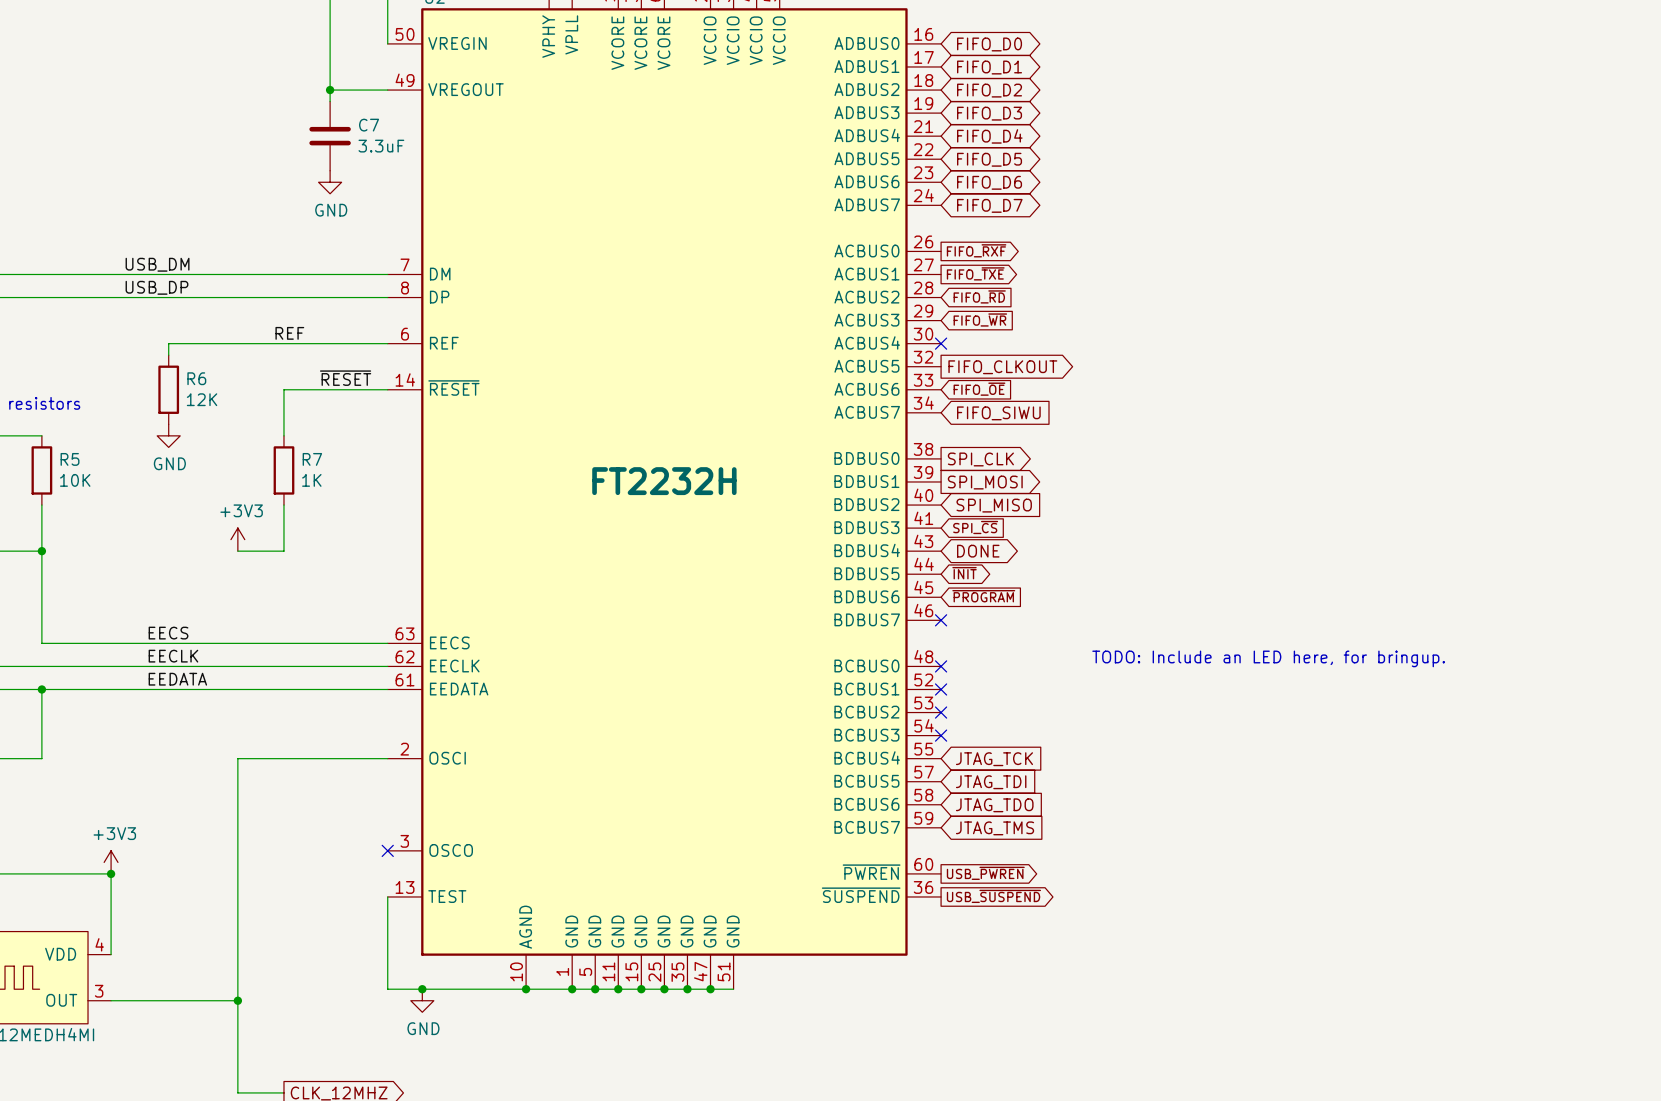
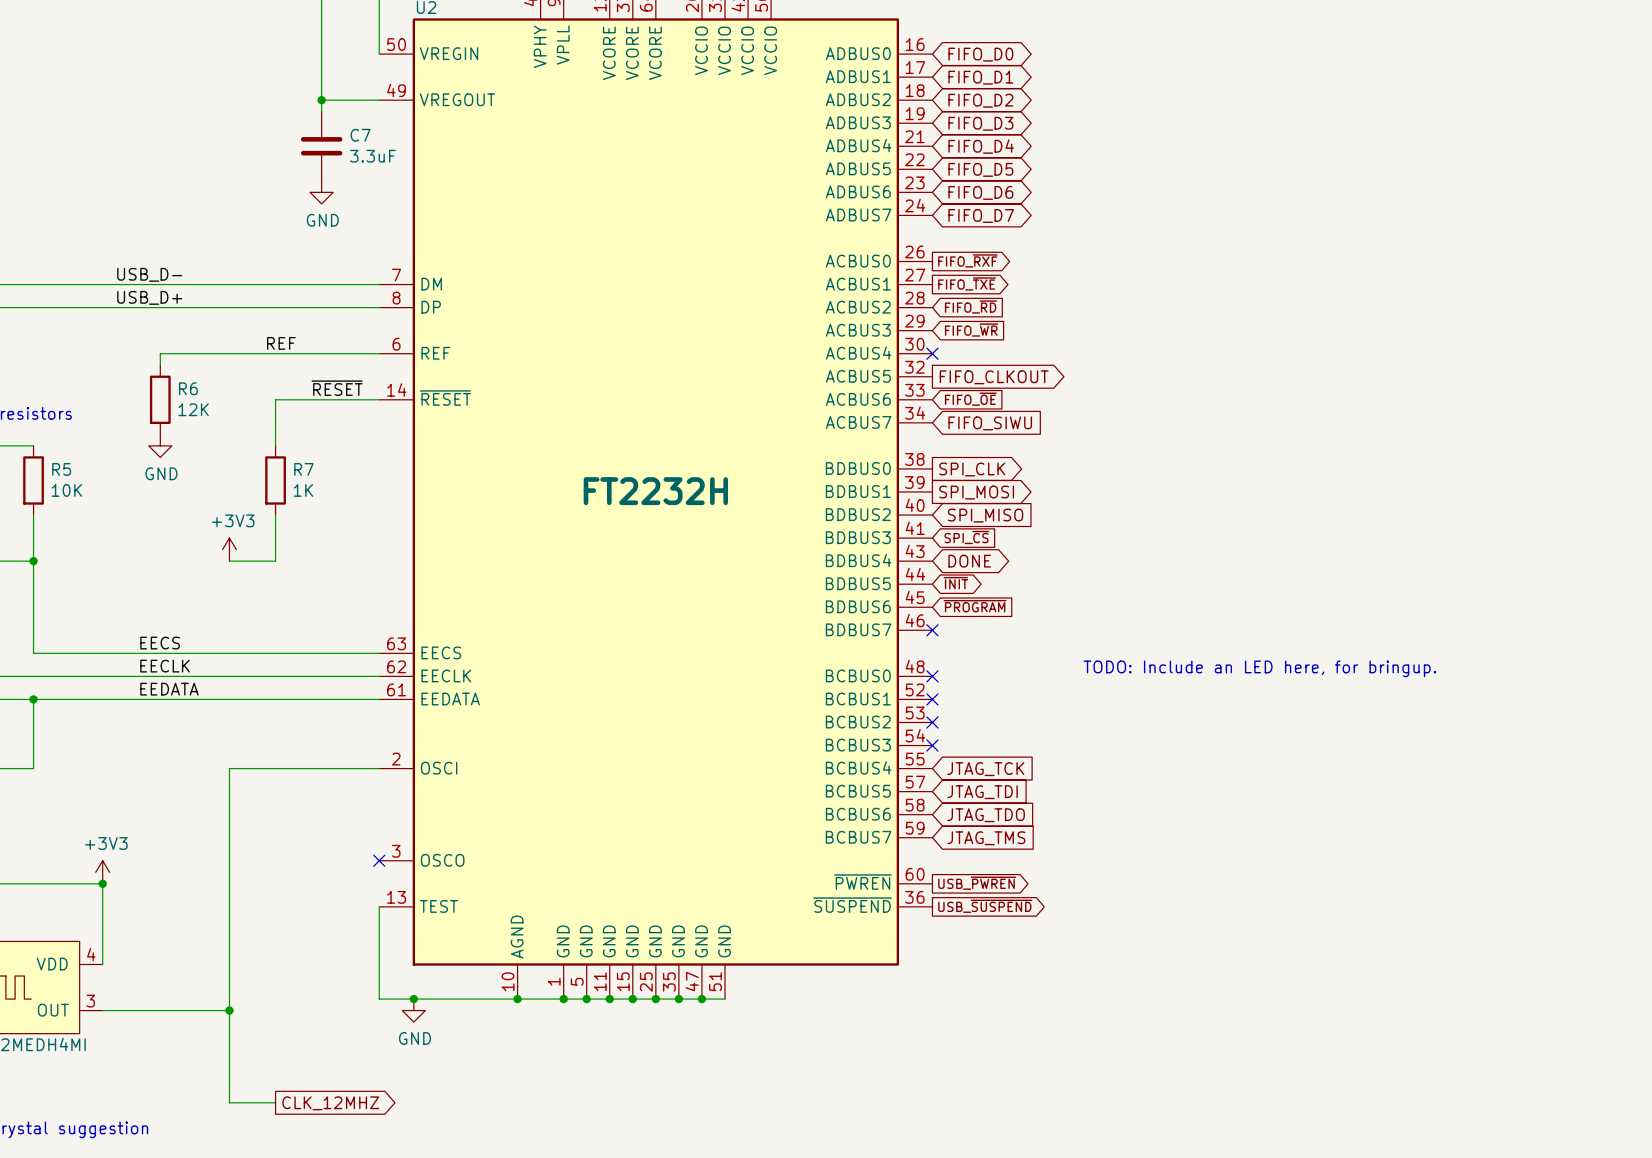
label: USB_DM (157, 264) -> USB_D- (149, 274)
label: USB_DP (156, 287) -> USB_D+ (149, 297)

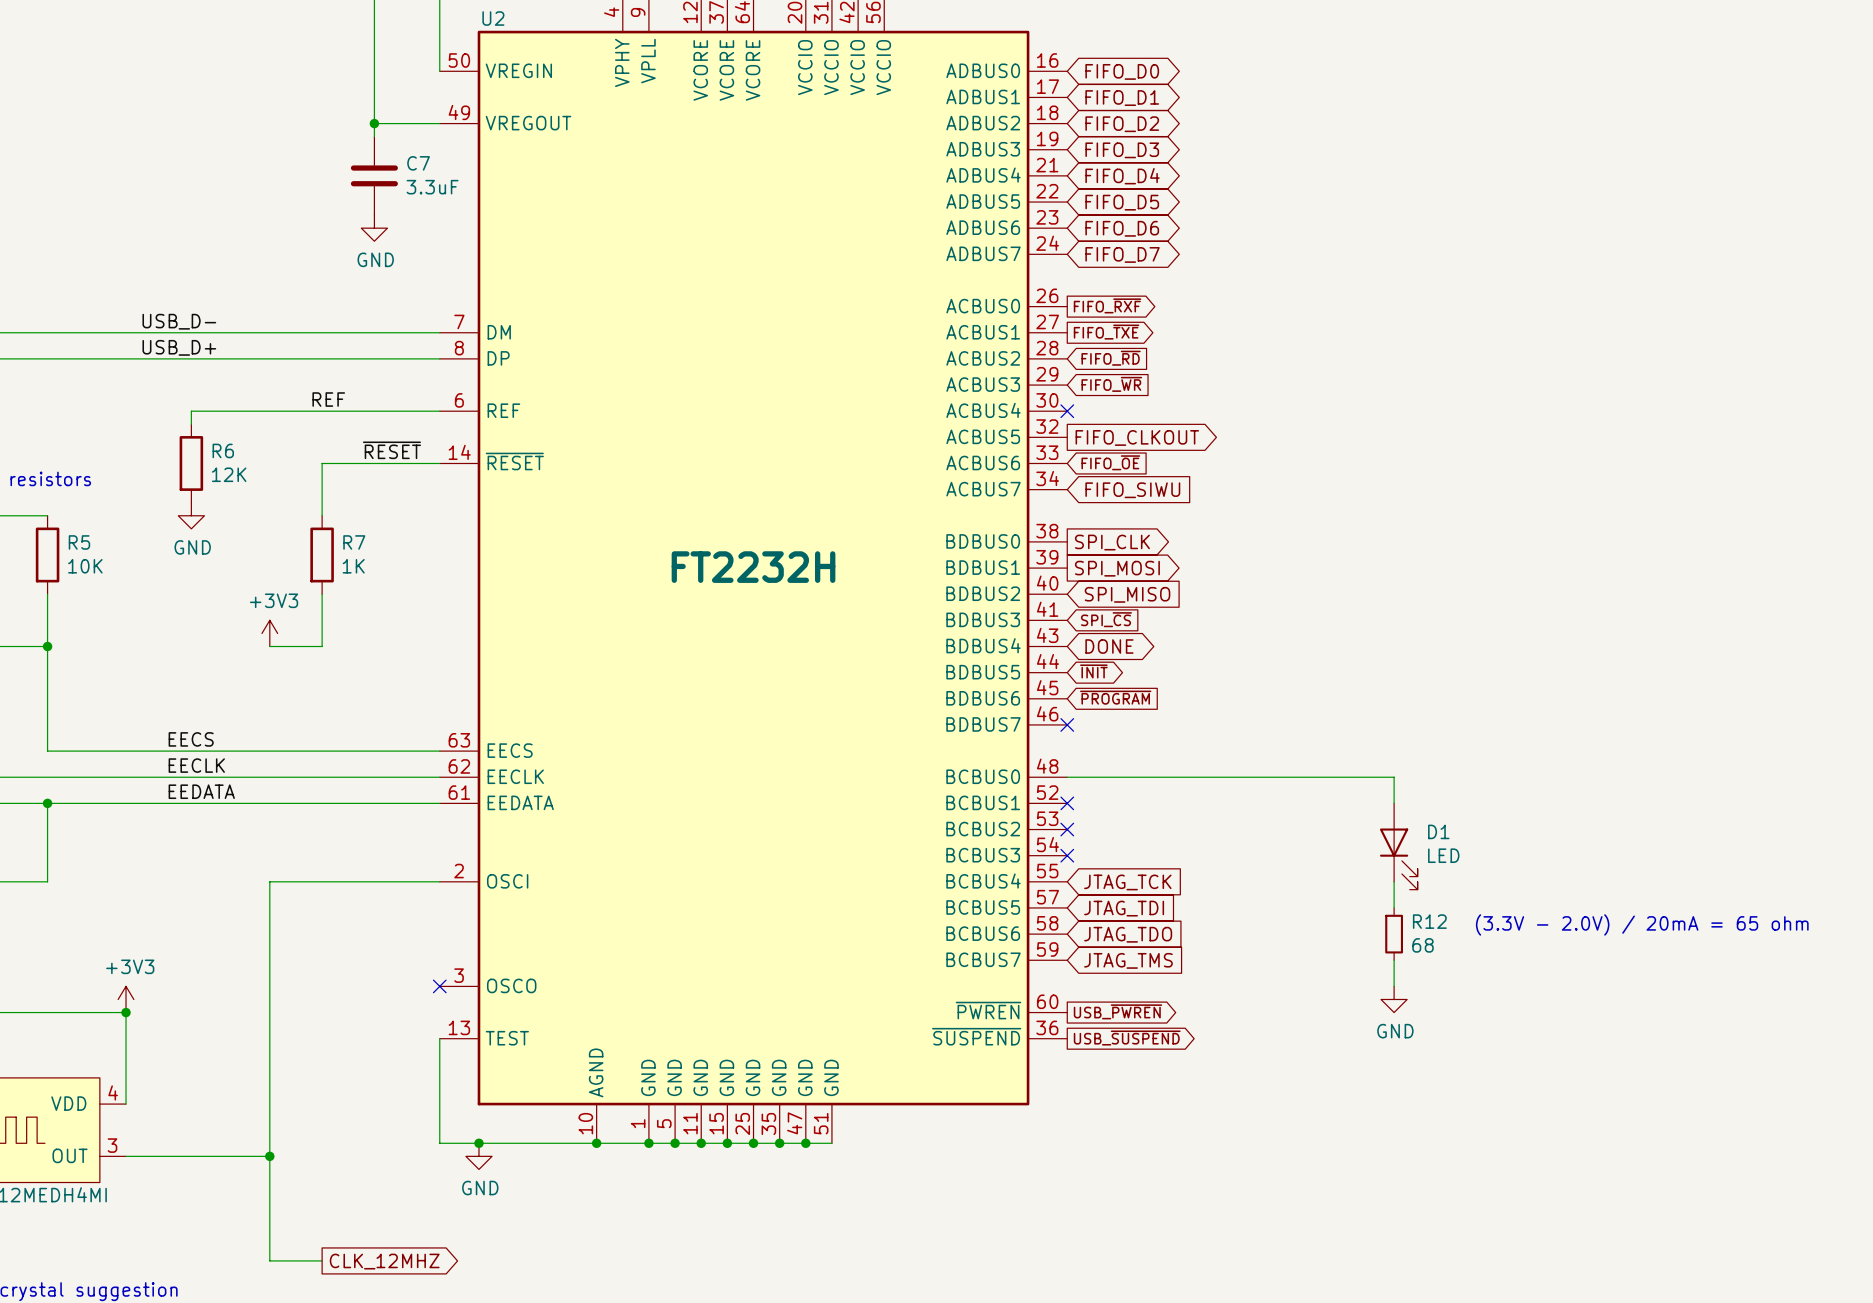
text: TODO: Include an LED here, for bringup. (1259, 668) -> none
wire: none -> (1067, 777) (1394, 777) (1394, 803)
no-connect mark: (932, 676) -> none
D1: none -> LED (1398, 846)
wire: none -> (1394, 881) (1394, 907)
text: none -> (3.3V - 2.0V) / 20mA = 65 ohm (1642, 924)
R12: none -> 68 (1394, 934)
wire: none -> (1394, 960) (1394, 986)
power symbol: none -> GND (1394, 999)

